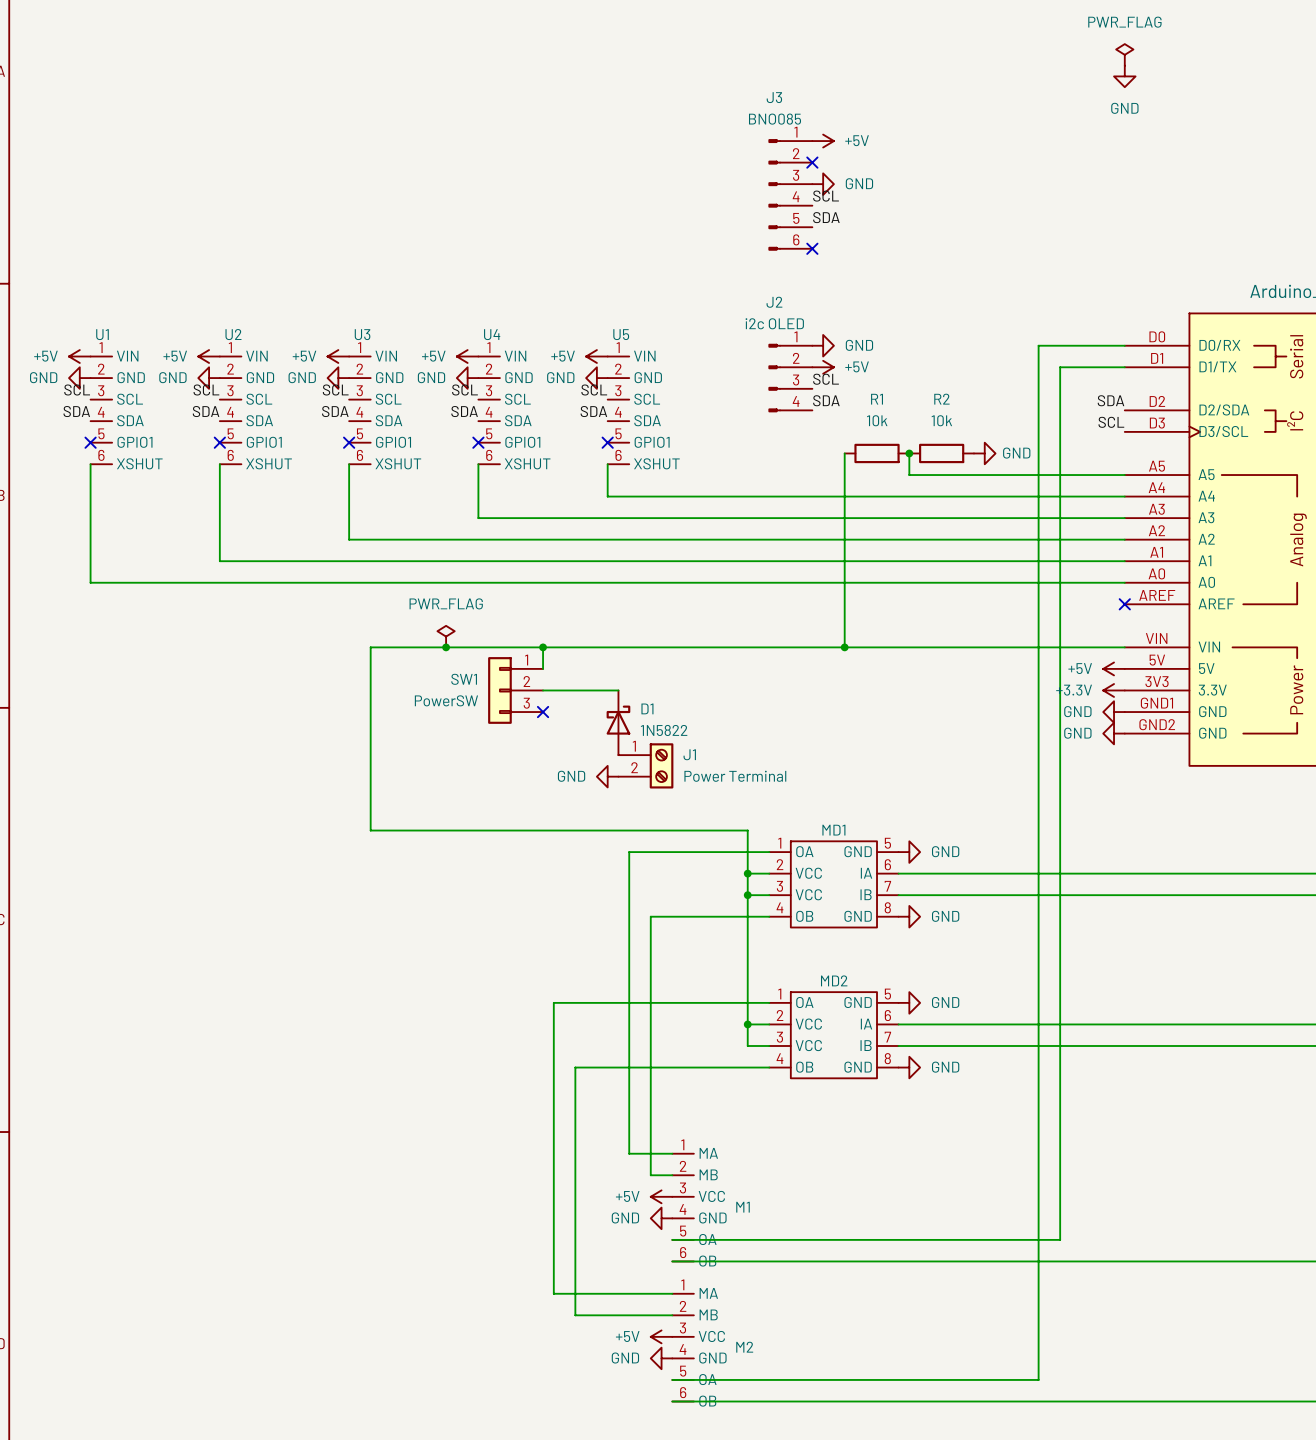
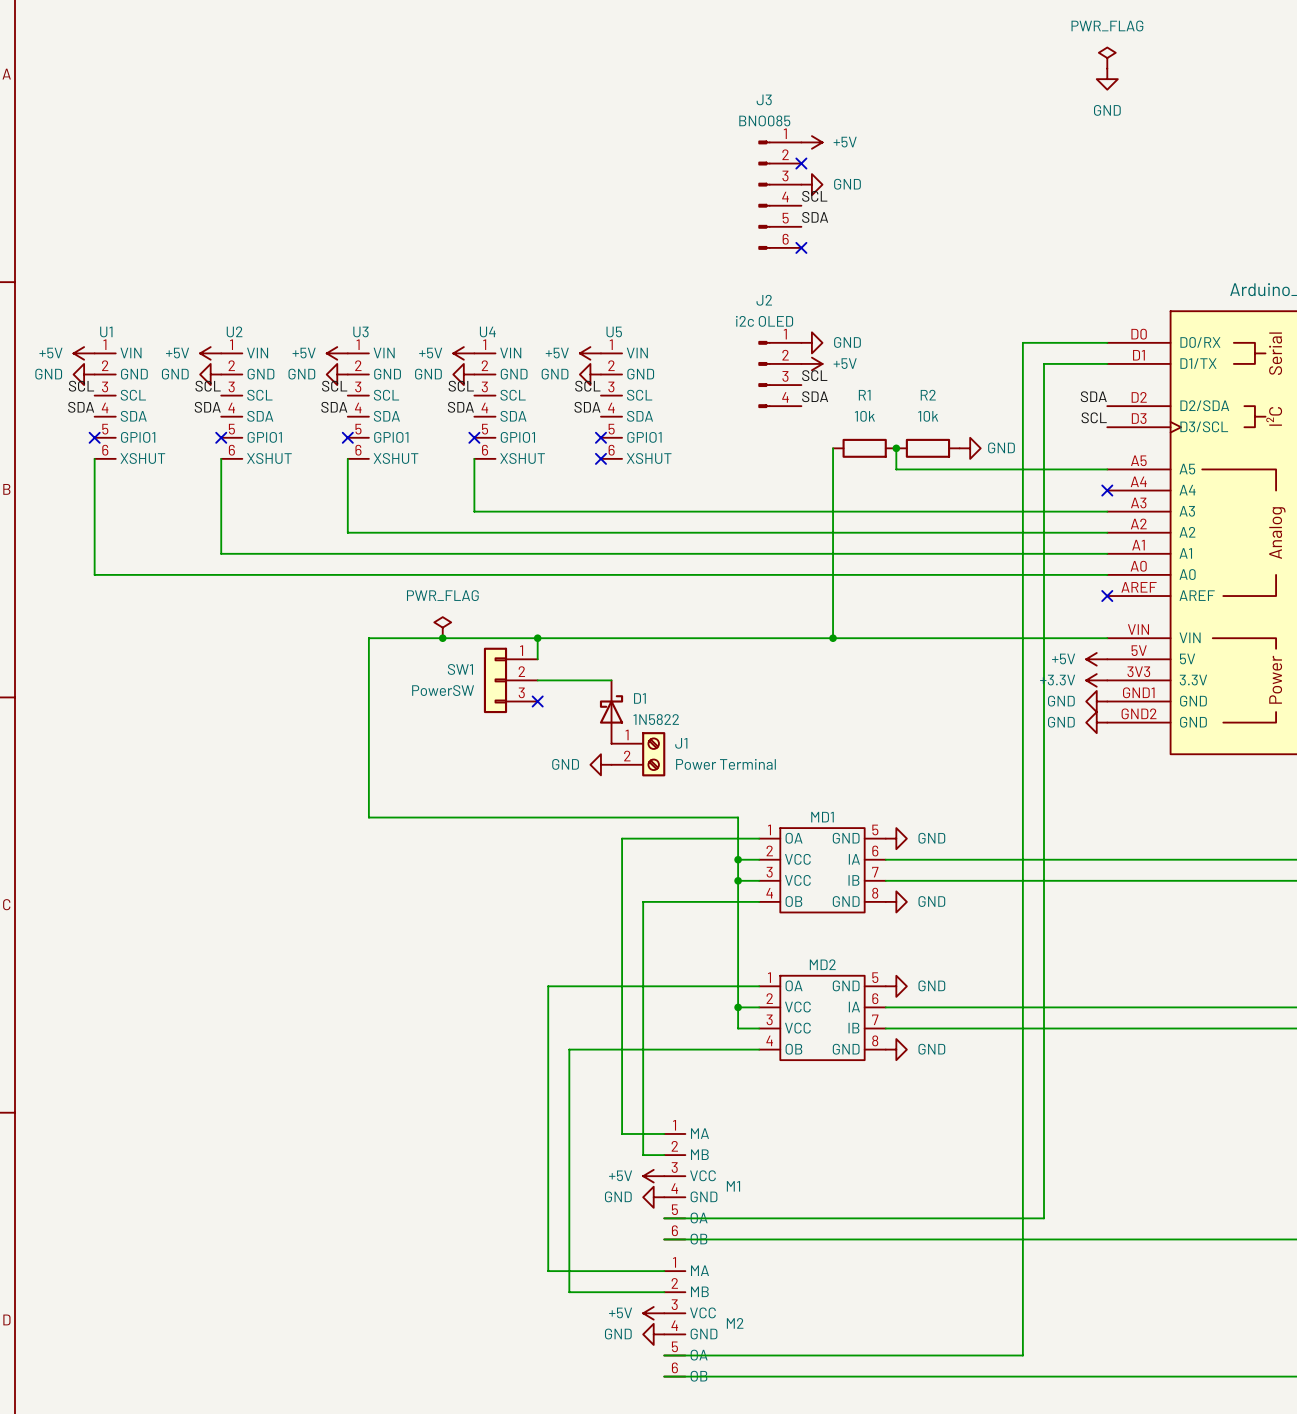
wire: (607, 464) (607, 496) (1124, 496) -> none
no-connect mark: none -> (600, 458)
no-connect mark: none -> (1107, 490)

